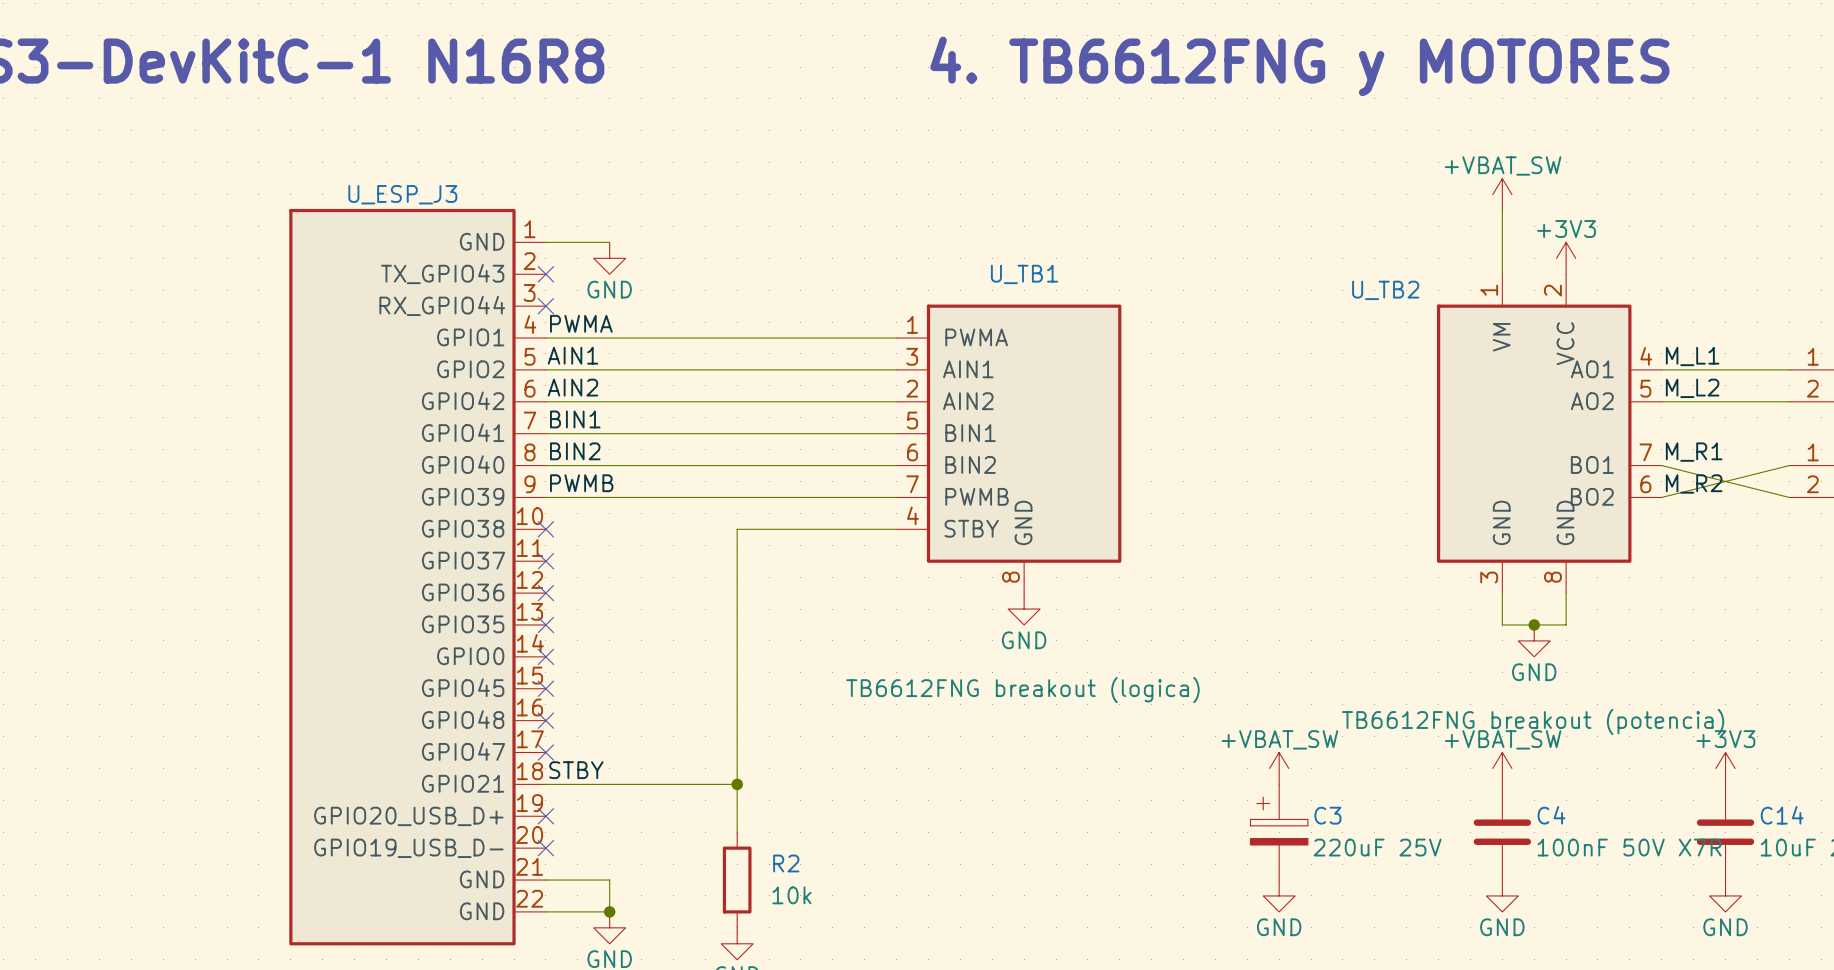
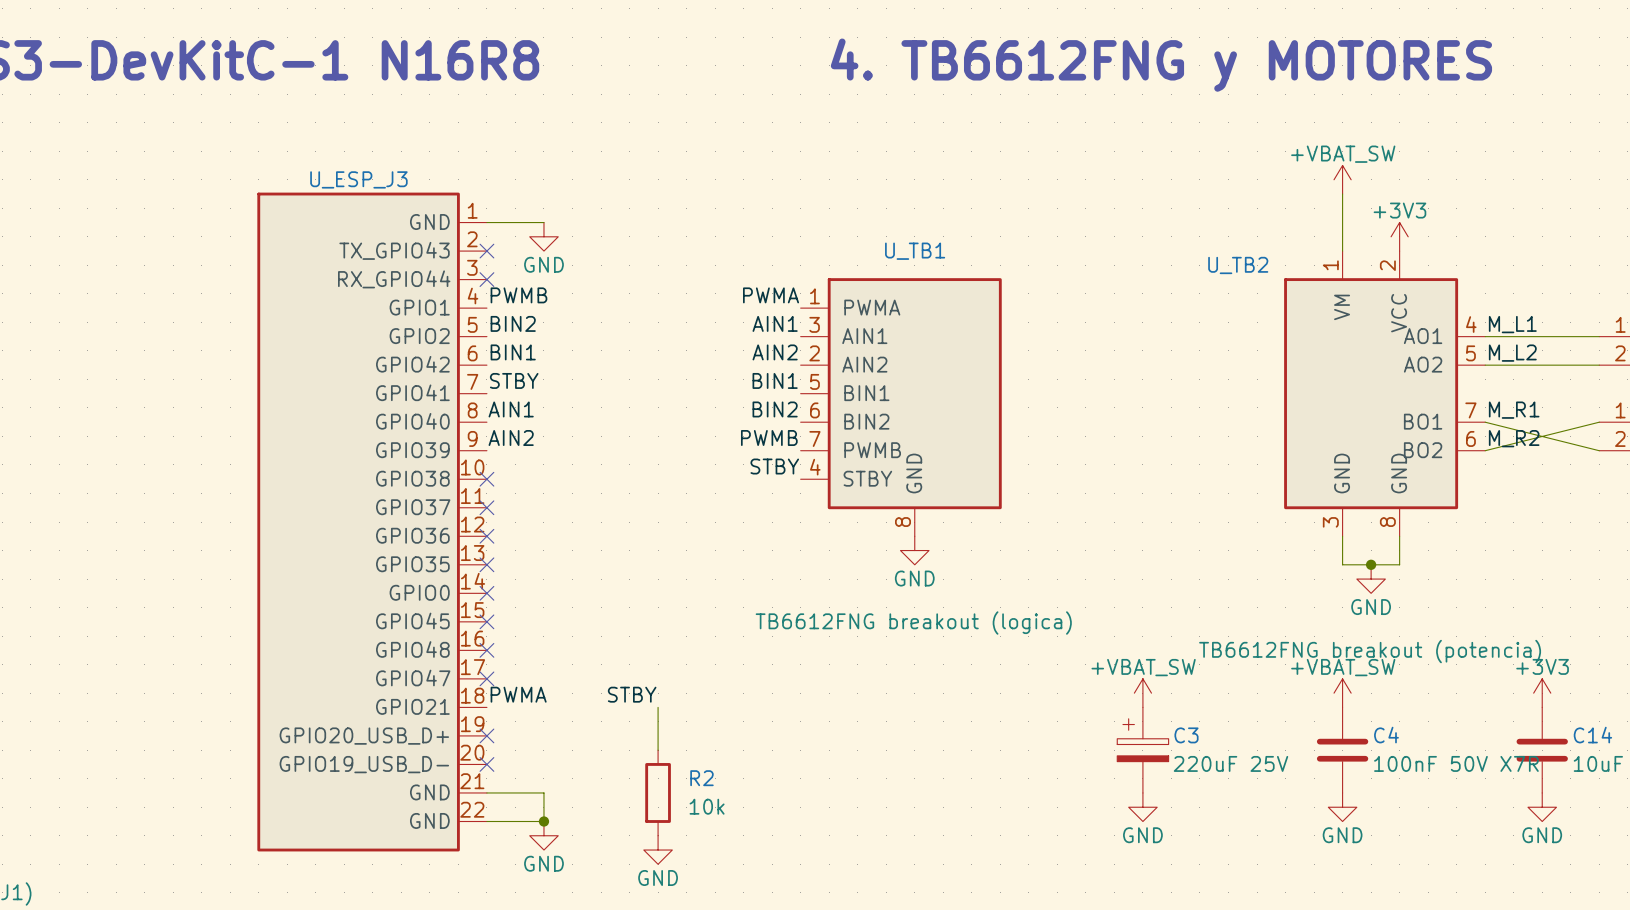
label: PWMA (581, 323) -> PWMB (518, 295)
label: none -> PWMA (771, 295)
wire: (545, 338) (896, 338) -> none
label: AIN1 (572, 355) -> BIN2 (513, 323)
label: none -> AIN1 (775, 323)
wire: (545, 369) (896, 369) -> none
label: AIN2 (572, 387) -> BIN1 (513, 352)
label: none -> AIN2 (775, 352)
wire: (545, 401) (896, 401) -> none
label: BIN1 (575, 419) -> STBY (514, 380)
label: none -> BIN1 (775, 380)
wire: (545, 433) (896, 433) -> none
label: BIN2 (575, 451) -> AIN1 (511, 409)
label: none -> BIN2 (775, 409)
wire: (545, 465) (896, 465) -> none
label: PWMB (581, 483) -> AIN2 (511, 437)
label: none -> PWMB (769, 437)
wire: (545, 497) (896, 497) -> none
label: none -> STBY (774, 466)
wire: (896, 529) (737, 529) (737, 784) (545, 784) -> none
label: STBY (576, 770) -> PWMA (518, 694)
label: none -> STBY (632, 694)
junction: (737, 784) -> none

